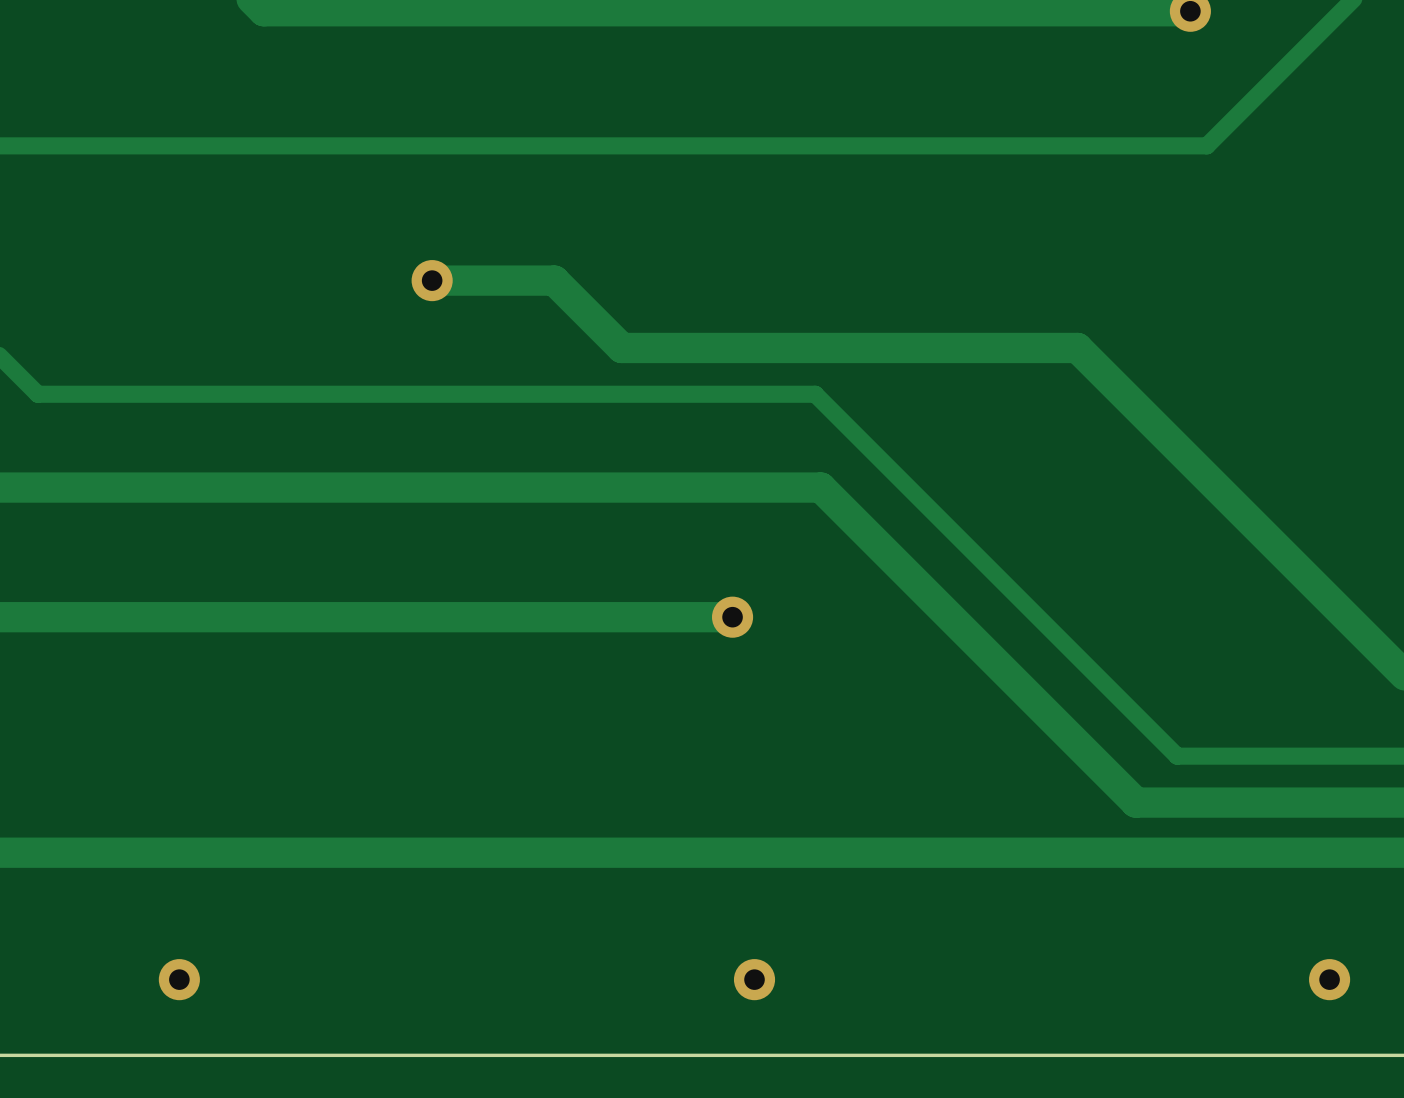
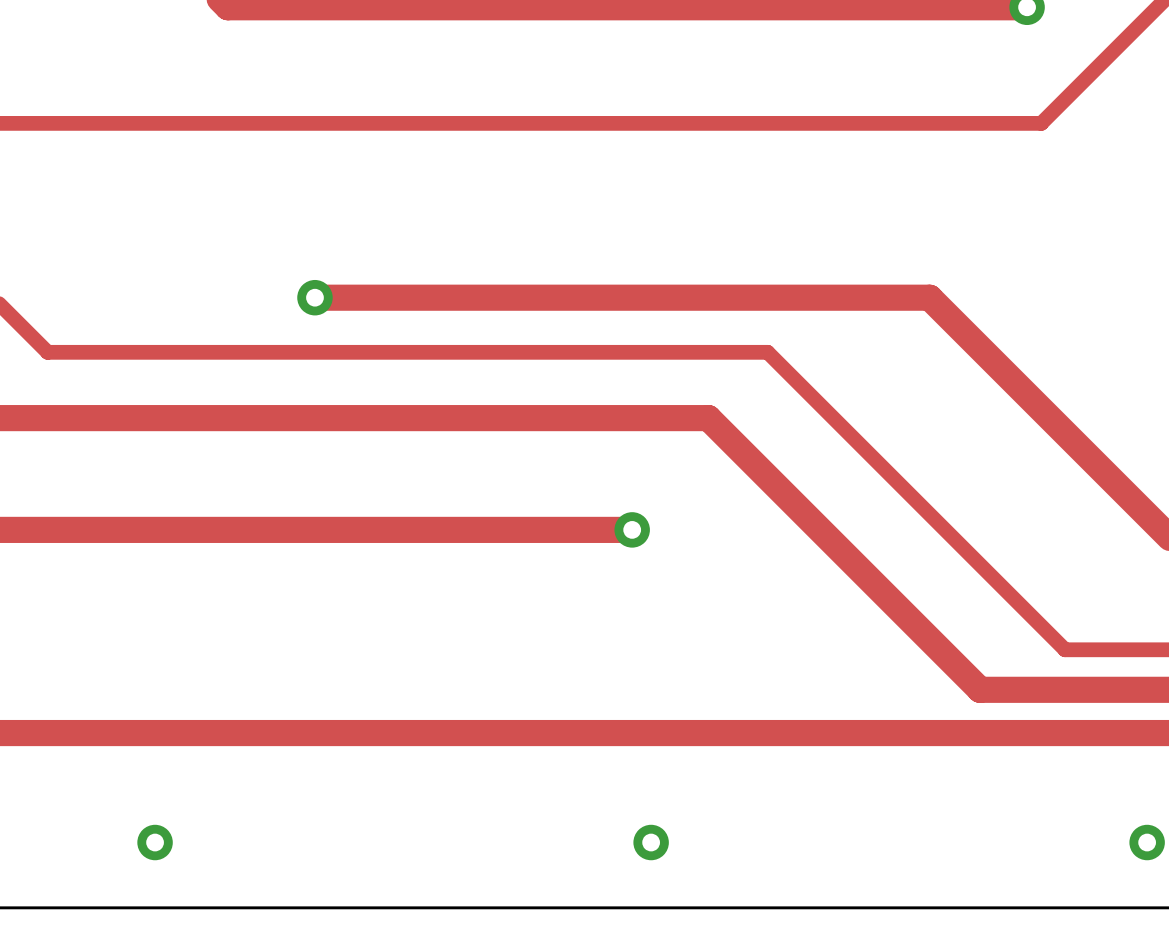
track: (432, 280) (554, 280) (621, 347) -> (314, 297) (536, 297)
via position: (432, 280) -> (314, 297)
track: (37, 394) (815, 394) (1177, 756) (1234, 756) -> (32, 337) (47, 352) (767, 352) (1065, 649)

